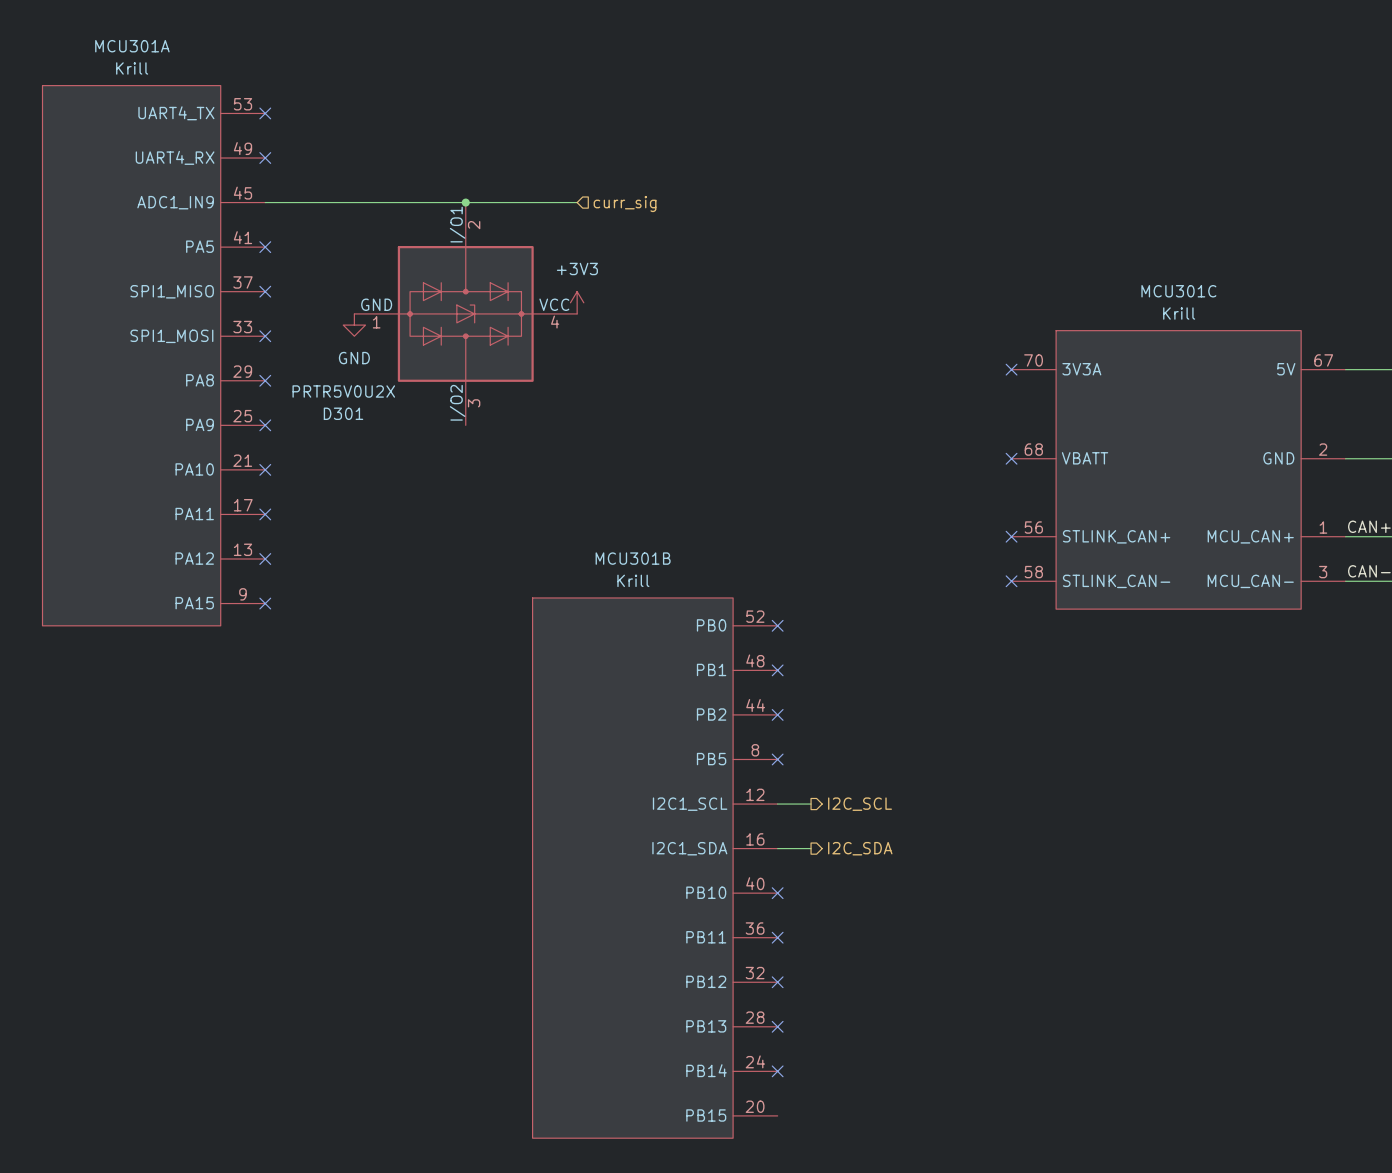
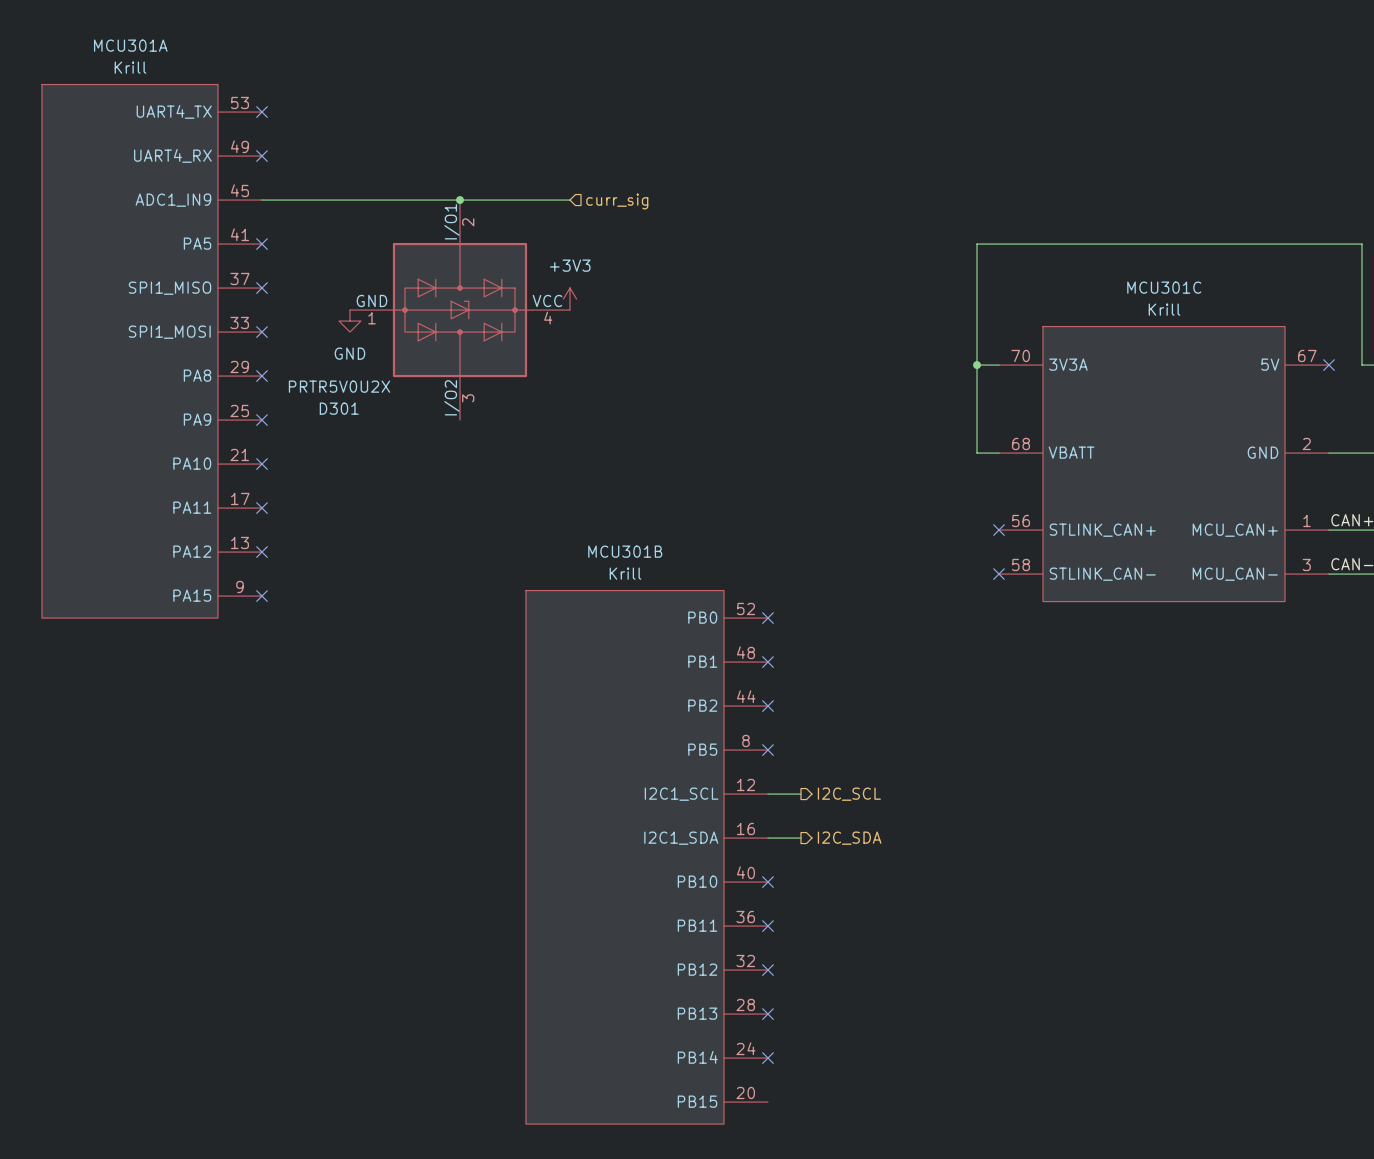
wire: none -> (976, 365) (998, 365)
junction: none -> (976, 365)
no-connect mark: (1011, 369) -> none
wire: (1345, 369) (1379, 369) -> (998, 453) (976, 453) (976, 244) (1362, 244) (1362, 365)
no-connect mark: none -> (1329, 365)
no-connect mark: (1011, 458) -> none

